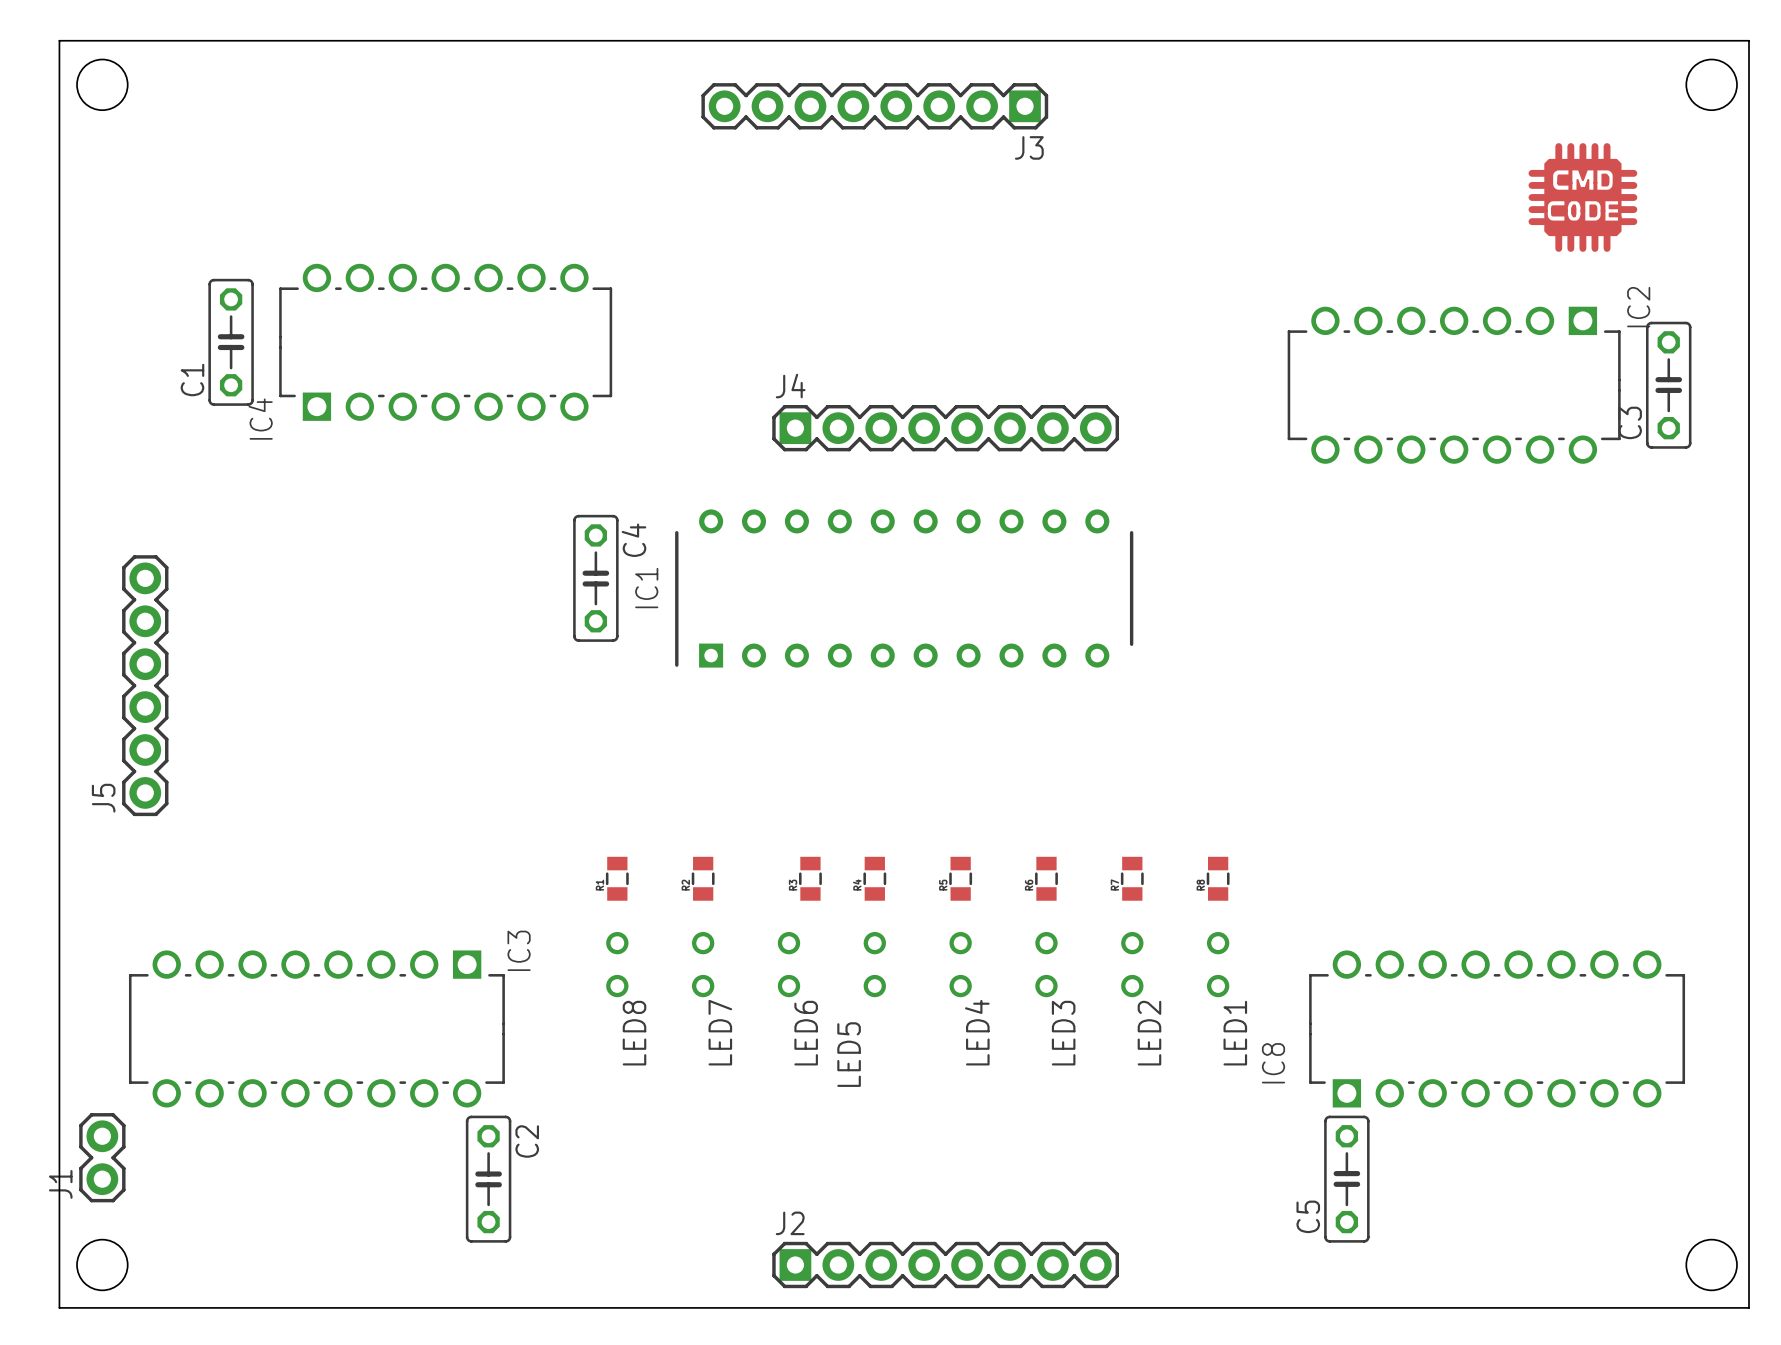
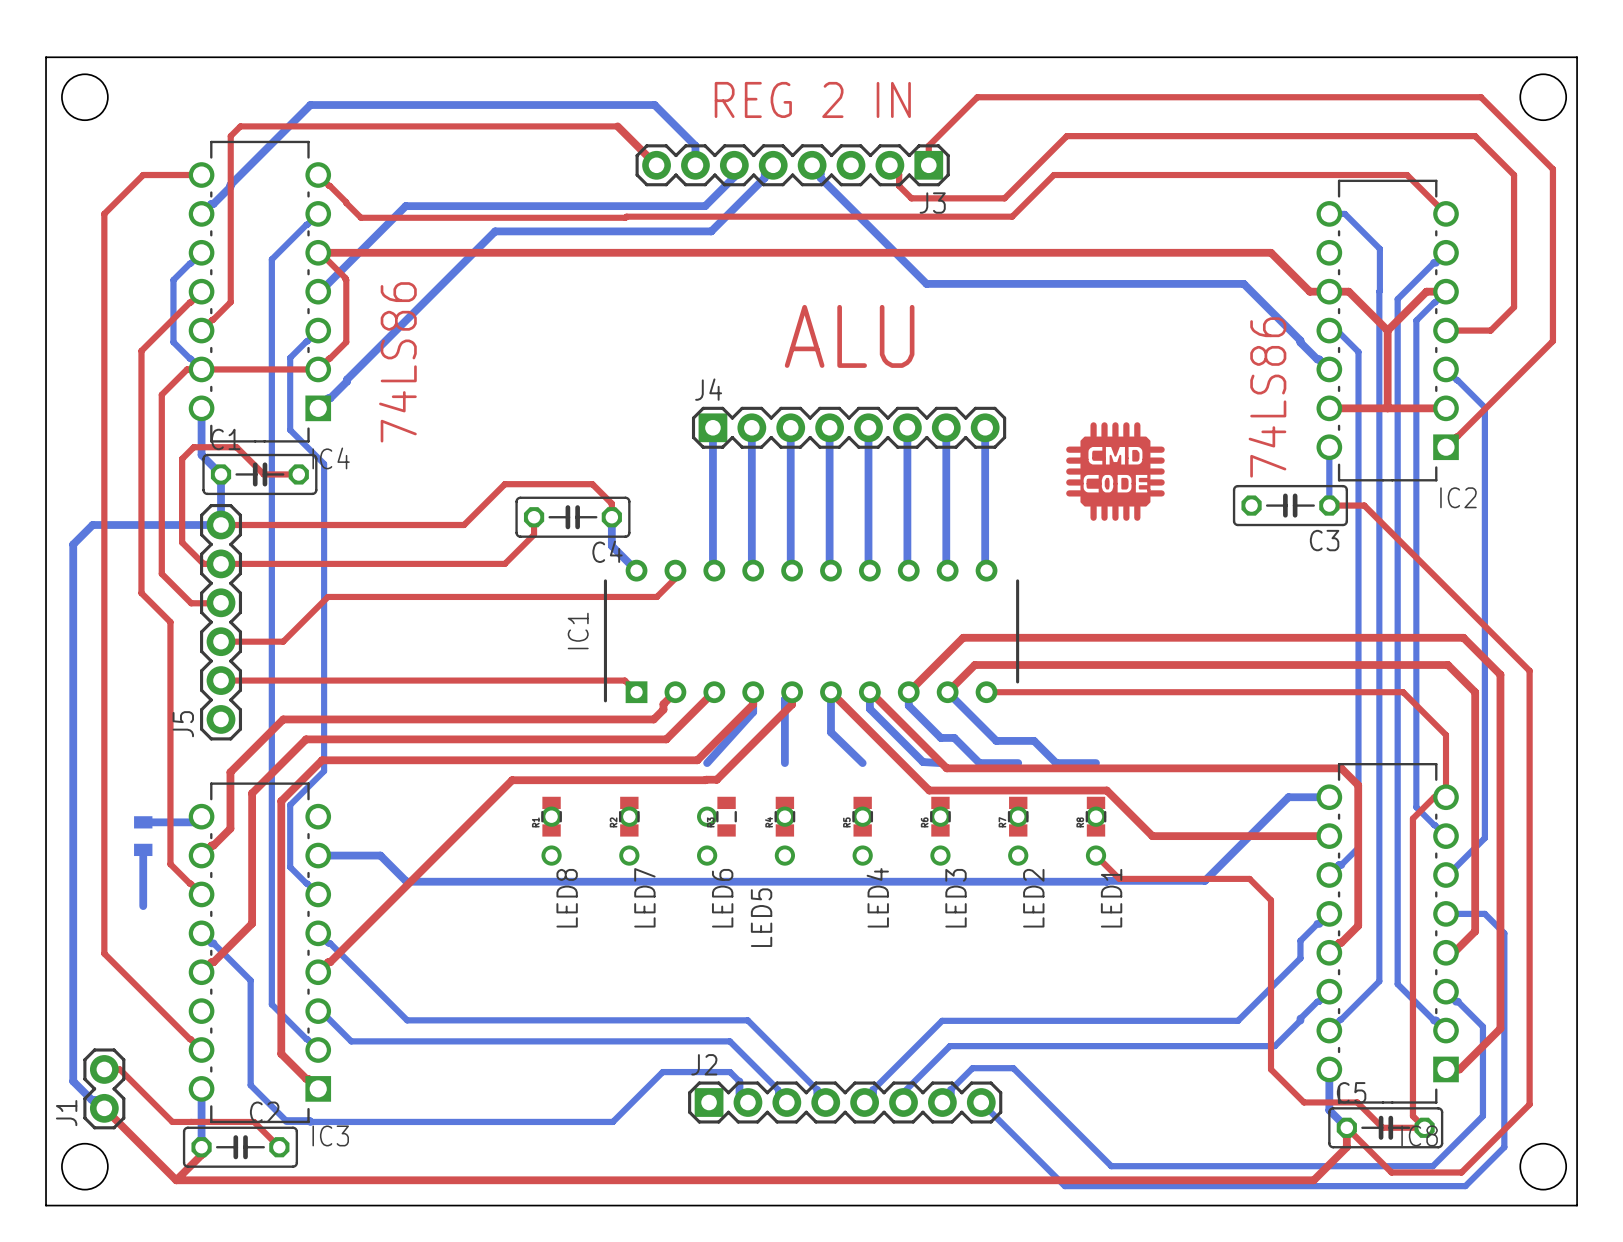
text: none -> REG 2 IN (812, 99)
J3 position: (874, 106) -> (792, 165)
drawing: [1528, 143, 1638, 252] -> none
top track: none -> (656, 165) (617, 126) (240, 126) (230, 136) (230, 302) (201, 330)
bottom track: none -> (695, 165) (695, 145) (654, 105) (310, 105) (201, 213)
bottom track: none -> (734, 165) (734, 176) (705, 206) (405, 206) (318, 291)
bottom track: none -> (773, 165) (764, 173) (764, 177) (711, 231) (495, 231) (318, 408)
bottom track: none -> (812, 165) (820, 173) (820, 177) (926, 283) (1243, 283) (1329, 369)
top track: none -> (889, 165) (899, 174) (899, 186) (911, 198) (1004, 198) (1066, 136) (1475, 136) (1514, 175) (1514, 307) (1490, 330) (1446, 330)
top track: none -> (928, 165) (928, 145) (977, 97) (1481, 97) (1552, 169) (1552, 341) (1446, 447)
top track: none -> (201, 175) (143, 175) (104, 213) (104, 953) (201, 1050)
top track: none -> (318, 175) (361, 217) (1012, 216) (1053, 175) (1407, 175) (1446, 213)
bottom track: none -> (318, 213) (271, 259) (271, 1004) (318, 1050)
bottom track: none -> (1329, 213) (1344, 213) (1379, 248) (1379, 981) (1329, 1030)
bottom track: none -> (201, 252) (173, 280) (173, 342) (201, 369)
bottom track: none -> (1446, 252) (1397, 299) (1397, 984) (1446, 1030)
top track: none -> (201, 291) (141, 350) (141, 593) (170, 622) (170, 864) (201, 894)
bottom track: none -> (1446, 291) (1416, 320) (1416, 807) (1446, 836)
top track: none -> (1446, 291) (1426, 291) (1387, 330)
C1 rotation: 0° (231, 342) -> 90° clockwise (259, 474)
C1 position: (231, 342) -> (259, 474)
bottom track: none -> (318, 330) (290, 357) (290, 430) (324, 463) (324, 771) (290, 805) (290, 867) (318, 894)
IC4 rotation: 0° (445, 342) -> 90° counterclockwise (259, 291)
bottom track: none -> (1329, 330) (1337, 330) (1358, 351) (1358, 847) (1329, 875)
top track: none -> (1387, 330) (1387, 408)
top track: none -> (1387, 330) (1348, 291) (1309, 291) (1271, 252) (318, 252) (346, 280) (346, 342) (318, 369) (187, 369) (161, 394) (161, 573) (191, 603) (221, 602)
text: none -> ALU (849, 336)
text: none -> 74LS86 (397, 362)
IC2 rotation: 0° (1454, 385) -> 90° clockwise (1387, 330)
bottom track: none -> (1446, 369) (1484, 407) (1484, 838) (1446, 875)
C3 rotation: 0° (1668, 385) -> 90° counterclockwise (1290, 505)
C3 position: (1668, 385) -> (1290, 505)
text: none -> 74LS86 (1267, 397)
bottom track: none -> (201, 408) (201, 455) (221, 474) (221, 525) (92, 525) (73, 544) (73, 1081) (91, 1099) (95, 1099) (104, 1108)
J4 position: (945, 428) -> (849, 427)
top track: none -> (1329, 408) (1446, 408)
drawing: none -> [1066, 422, 1165, 521]
bottom track: none -> (712, 427) (714, 570)
bottom track: none -> (751, 427) (753, 570)
bottom track: none -> (790, 427) (792, 570)
bottom track: none -> (829, 427) (830, 570)
bottom track: none -> (868, 427) (869, 570)
bottom track: none -> (907, 427) (908, 570)
bottom track: none -> (946, 427) (947, 570)
bottom track: none -> (985, 427) (986, 570)
bottom track: none -> (1329, 447) (1329, 505)
top track: none -> (298, 474) (263, 474) (236, 447) (193, 447) (182, 458) (182, 542) (203, 563) (504, 563) (534, 534) (534, 517)
top track: none -> (1329, 505) (1364, 505) (1529, 670) (1529, 1104) (1461, 1172) (1391, 1172) (1346, 1127) (1346, 1147) (1313, 1180) (176, 1180)
bottom track: none -> (611, 517) (611, 545) (636, 570)
top track: none -> (611, 517) (611, 503) (592, 484) (504, 484) (464, 525) (221, 525)
C4 rotation: 0° (595, 578) -> 90° clockwise (572, 517)
IC1 position: (904, 588) -> (811, 631)
top track: none -> (675, 570) (675, 578) (656, 596) (327, 596) (283, 641) (221, 641)
J5 position: (145, 685) -> (221, 622)
top track: none -> (221, 680) (624, 680) (636, 692)
top track: none -> (675, 692) (663, 704) (663, 709) (653, 719) (283, 719) (230, 772) (230, 828) (201, 855)
top track: none -> (714, 692) (666, 739) (306, 739) (252, 793) (252, 923) (201, 972)
bottom track: none -> (753, 692) (753, 712) (707, 763)
top track: none -> (753, 692) (753, 704) (697, 760) (322, 760) (281, 801) (281, 1053) (318, 1088)
bottom track: none -> (792, 692) (784, 699) (784, 763)
top track: none -> (792, 692) (792, 704) (716, 779) (512, 780) (318, 972)
bottom track: none -> (830, 692) (830, 732) (862, 763)
top track: none -> (830, 692) (929, 790) (1106, 790) (1152, 836) (1329, 836)
bottom track: none -> (869, 692) (869, 708) (923, 762) (940, 763)
top track: none -> (869, 692) (946, 768) (1341, 768) (1358, 785) (1358, 925) (1329, 952)
bottom track: none -> (908, 692) (908, 705) (940, 737) (954, 737) (979, 763) (1018, 763)
top track: none -> (908, 692) (963, 637) (1463, 637) (1500, 674) (1500, 1028) (1459, 1069) (1446, 1069)
bottom track: none -> (947, 692) (996, 740) (1034, 740) (1056, 763) (1096, 763)
top track: none -> (947, 692) (974, 665) (1447, 665) (1475, 692) (1475, 931) (1453, 952) (1446, 952)
top track: none -> (986, 692) (1403, 692) (1446, 735) (1446, 797) (1434, 797) (1412, 818) (1412, 1116) (1424, 1127) (1382, 1127) (1357, 1102) (1304, 1102) (1271, 1069) (1271, 900) (1249, 878) (1119, 878) (1096, 855)
bottom track: none -> (1329, 797) (1288, 797) (1204, 880) (406, 881) (380, 855) (318, 855)
bottom track: none -> (201, 816) (195, 822) (143, 822)
part: none -> (143, 836)
bottom track: none -> (143, 849) (143, 906)
LED8 position: (617, 964) -> (551, 836)
LED7 position: (703, 964) -> (629, 836)
LED6 position: (788, 964) -> (707, 836)
LED5 position: (874, 964) -> (784, 836)
LED4 position: (960, 964) -> (862, 836)
LED3 position: (1046, 964) -> (940, 836)
LED2 position: (1132, 964) -> (1018, 836)
LED1 position: (1218, 964) -> (1096, 836)
bottom track: none -> (1329, 913) (1300, 940) (1300, 958) (1237, 1020) (942, 1020) (873, 1089) (873, 1094) (864, 1102)
bottom track: none -> (1446, 913) (1484, 913) (1504, 933) (1504, 1147) (1465, 1186) (1064, 1186) (981, 1102)
bottom track: none -> (201, 933) (250, 980) (250, 1085) (286, 1121) (612, 1121) (662, 1072) (730, 1072) (739, 1081) (739, 1094) (747, 1102)
bottom track: none -> (318, 933) (407, 1020) (747, 1020) (817, 1089) (817, 1094) (825, 1102)
IC3 rotation: 0° (316, 1028) -> 90° clockwise (259, 952)
IC8 rotation: 0° (1497, 1028) -> 90° counterclockwise (1387, 933)
bottom track: none -> (1329, 991) (1274, 1046) (949, 1046) (903, 1092) (903, 1102)
bottom track: none -> (1446, 991) (1482, 1026) (1482, 1116) (1432, 1166) (1111, 1166) (1013, 1068) (972, 1068) (950, 1089) (950, 1094) (942, 1102)
bottom track: none -> (318, 1011) (321, 1011) (351, 1041) (729, 1041) (778, 1089) (778, 1094) (786, 1102)
J1 position: (102, 1157) -> (104, 1088)
top track: none -> (104, 1069) (119, 1069) (172, 1121) (254, 1121) (279, 1147)
bottom track: none -> (1329, 1069) (1329, 1110) (1346, 1127)
bottom track: none -> (201, 1088) (201, 1147)
C2 rotation: 0° (488, 1179) -> 90° counterclockwise (240, 1147)
C2 position: (488, 1179) -> (240, 1147)
C5 rotation: 0° (1346, 1179) -> 90° clockwise (1385, 1127)
C5 position: (1346, 1179) -> (1385, 1127)
top track: none -> (104, 1108) (176, 1180)
top track: none -> (201, 1147) (201, 1155) (176, 1180)
J2 position: (945, 1264) -> (845, 1102)

